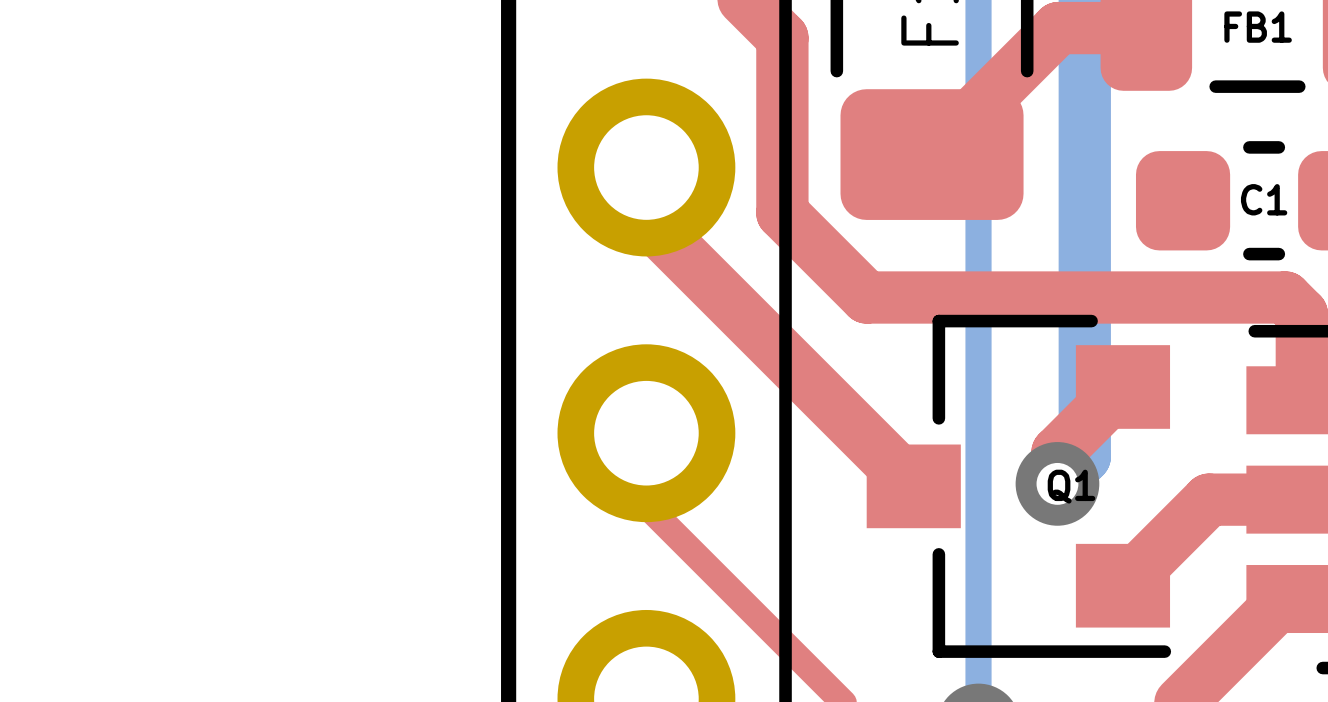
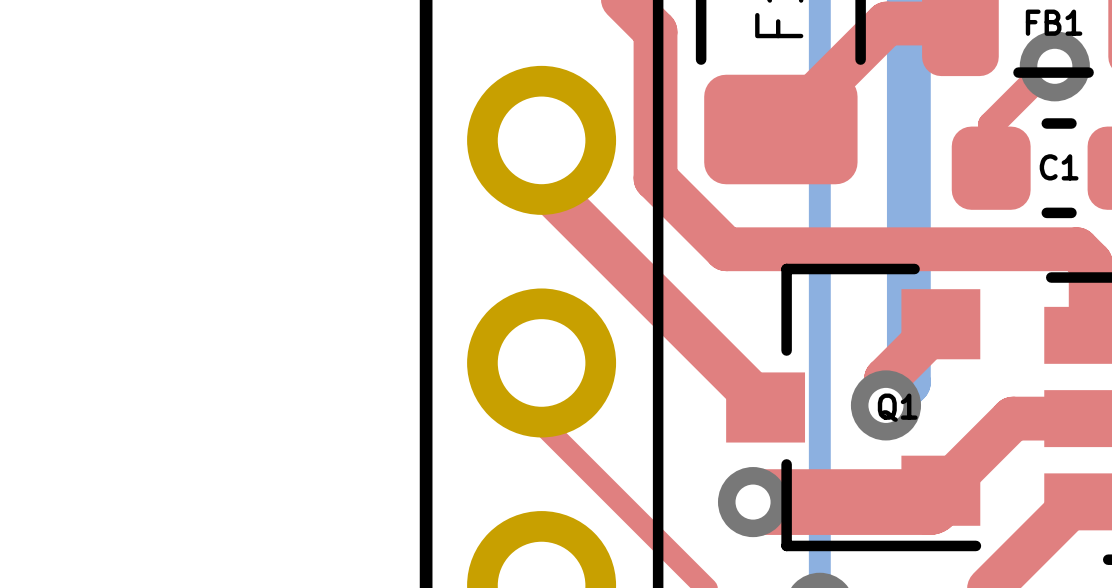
via: none -> (1054, 66)
top track: none -> (1031, 84) (991, 124) (991, 168)
top track: none -> (940, 490) (929, 502) (753, 502)
via: none -> (753, 502)

